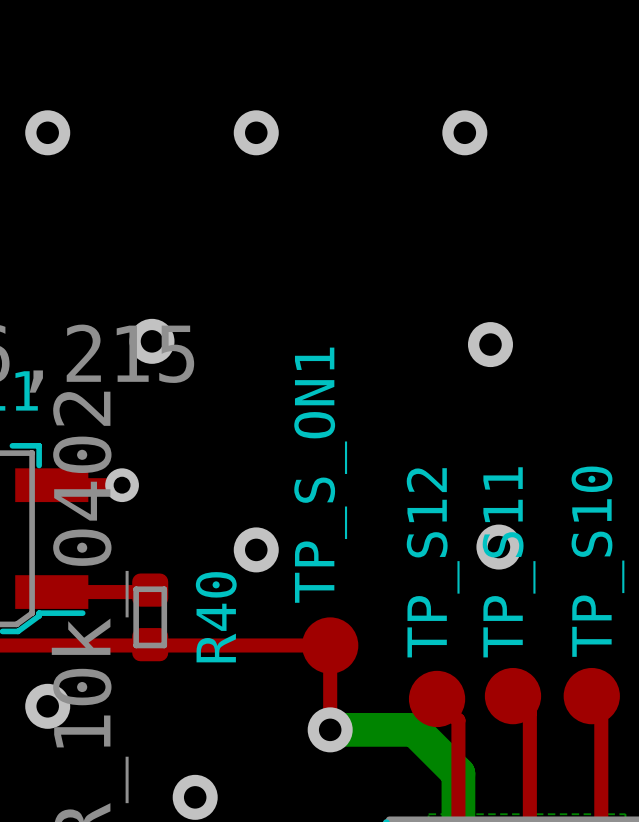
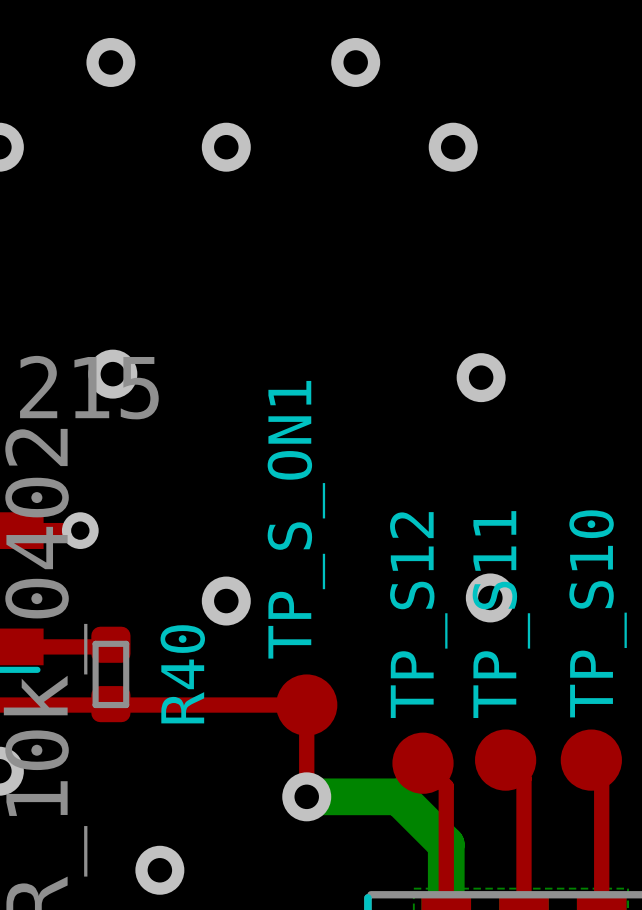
via: none -> (110, 62)
via: none -> (355, 62)

